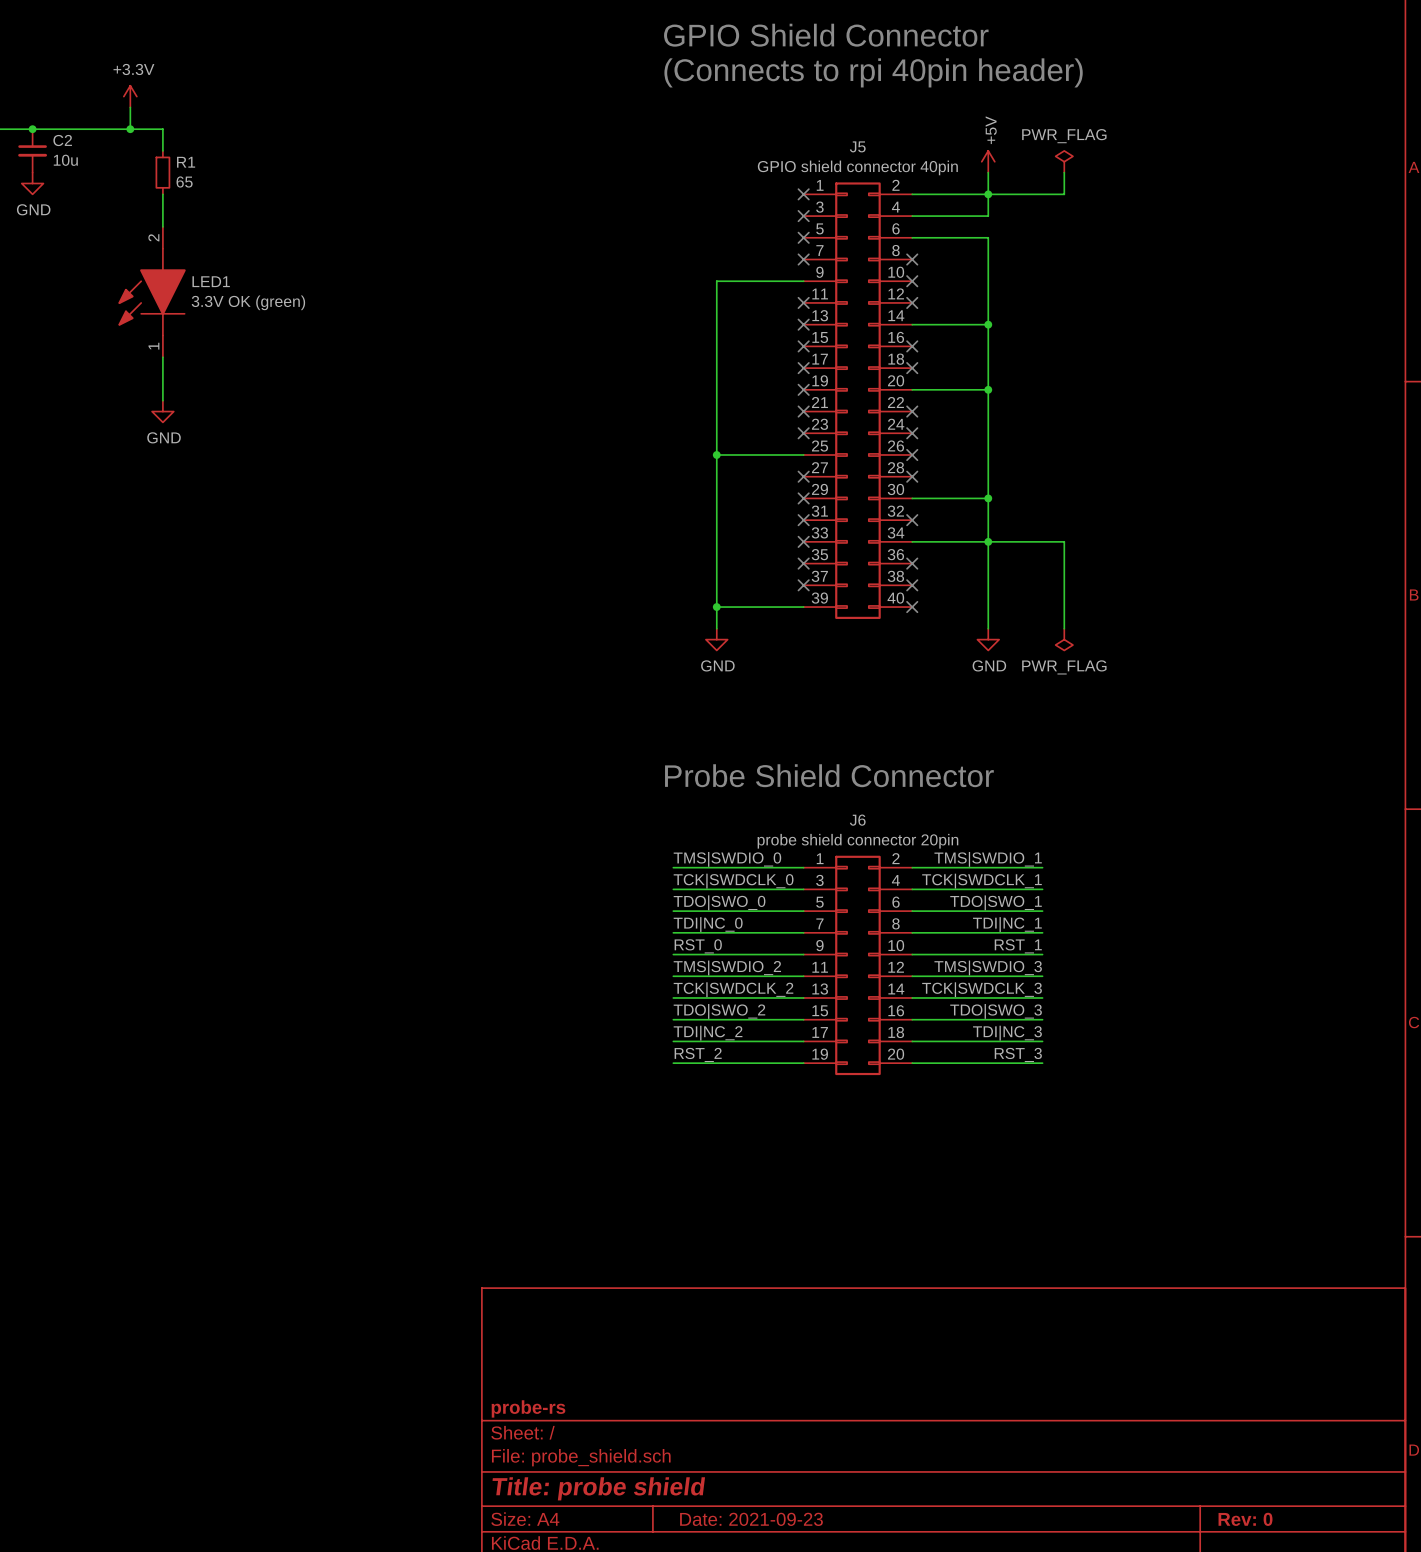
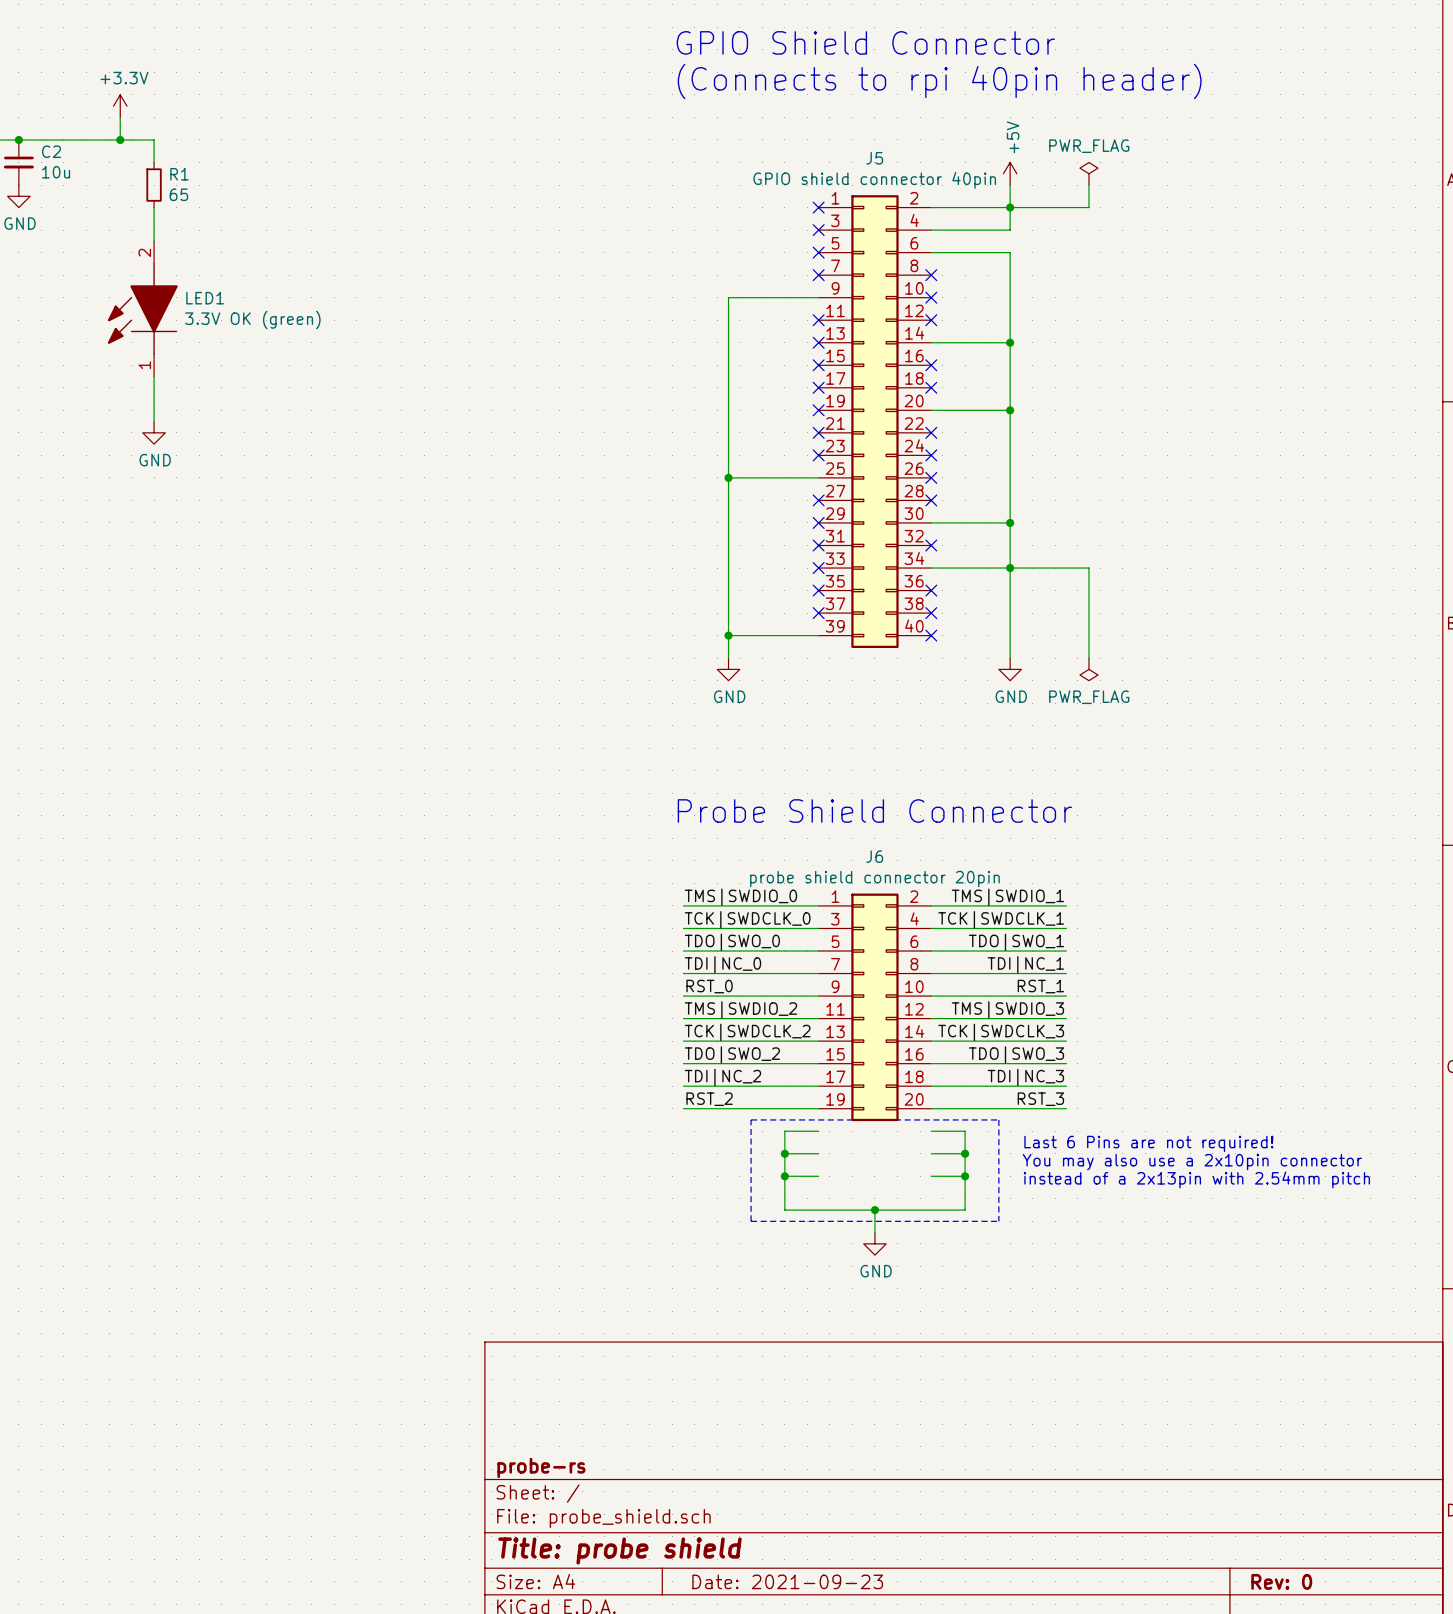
line: none -> (751, 1119) (751, 1221) (998, 1221) (998, 1119) (751, 1119)
wire: none -> (818, 1131) (784, 1131) (784, 1210) (965, 1210) (965, 1131) (931, 1131)
text: none -> Last 6 Pins are not required! (1148, 1143)
wire: none -> (784, 1153) (818, 1153)
junction: none -> (784, 1153)
wire: none -> (931, 1153) (965, 1153)
junction: none -> (965, 1153)
text: none -> You may also use a 2x10pin connector (1192, 1162)
wire: none -> (784, 1176) (818, 1176)
junction: none -> (784, 1176)
wire: none -> (931, 1176) (965, 1176)
junction: none -> (965, 1176)
text: none -> instead of a 2x13pin with 2.54mm pitch (1196, 1179)
wire: none -> (874, 1210) (874, 1232)
junction: none -> (874, 1210)
power symbol: none -> GND (874, 1243)

